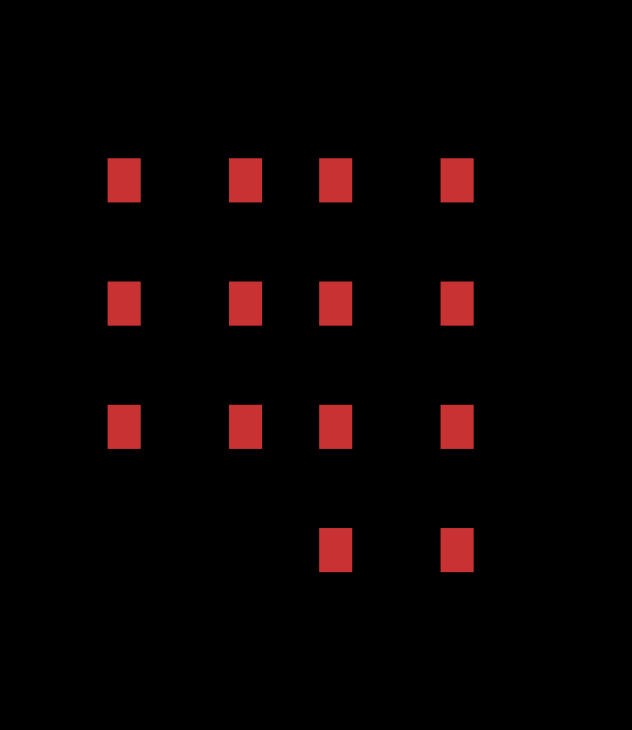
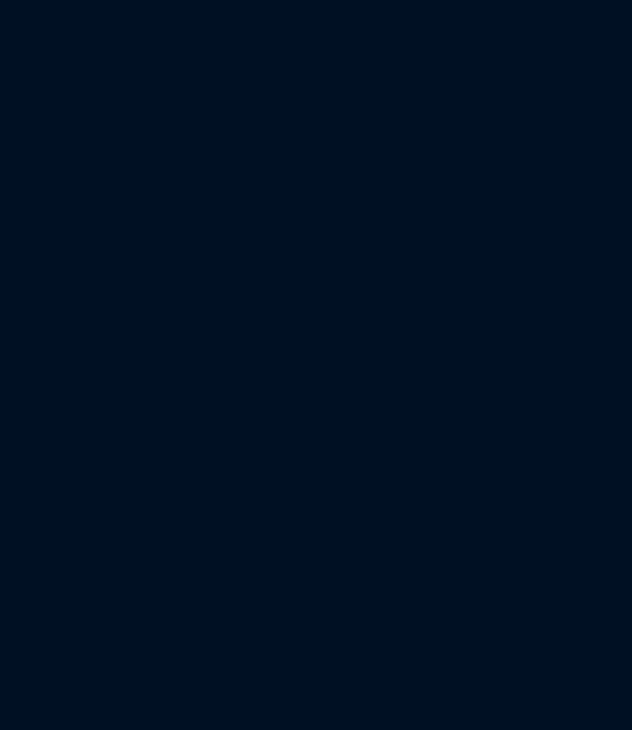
part: (184, 180) -> none
part: (396, 180) -> none
part: (184, 303) -> none
part: (396, 303) -> none
part: (184, 426) -> none
part: (396, 426) -> none
part: (396, 550) -> none

